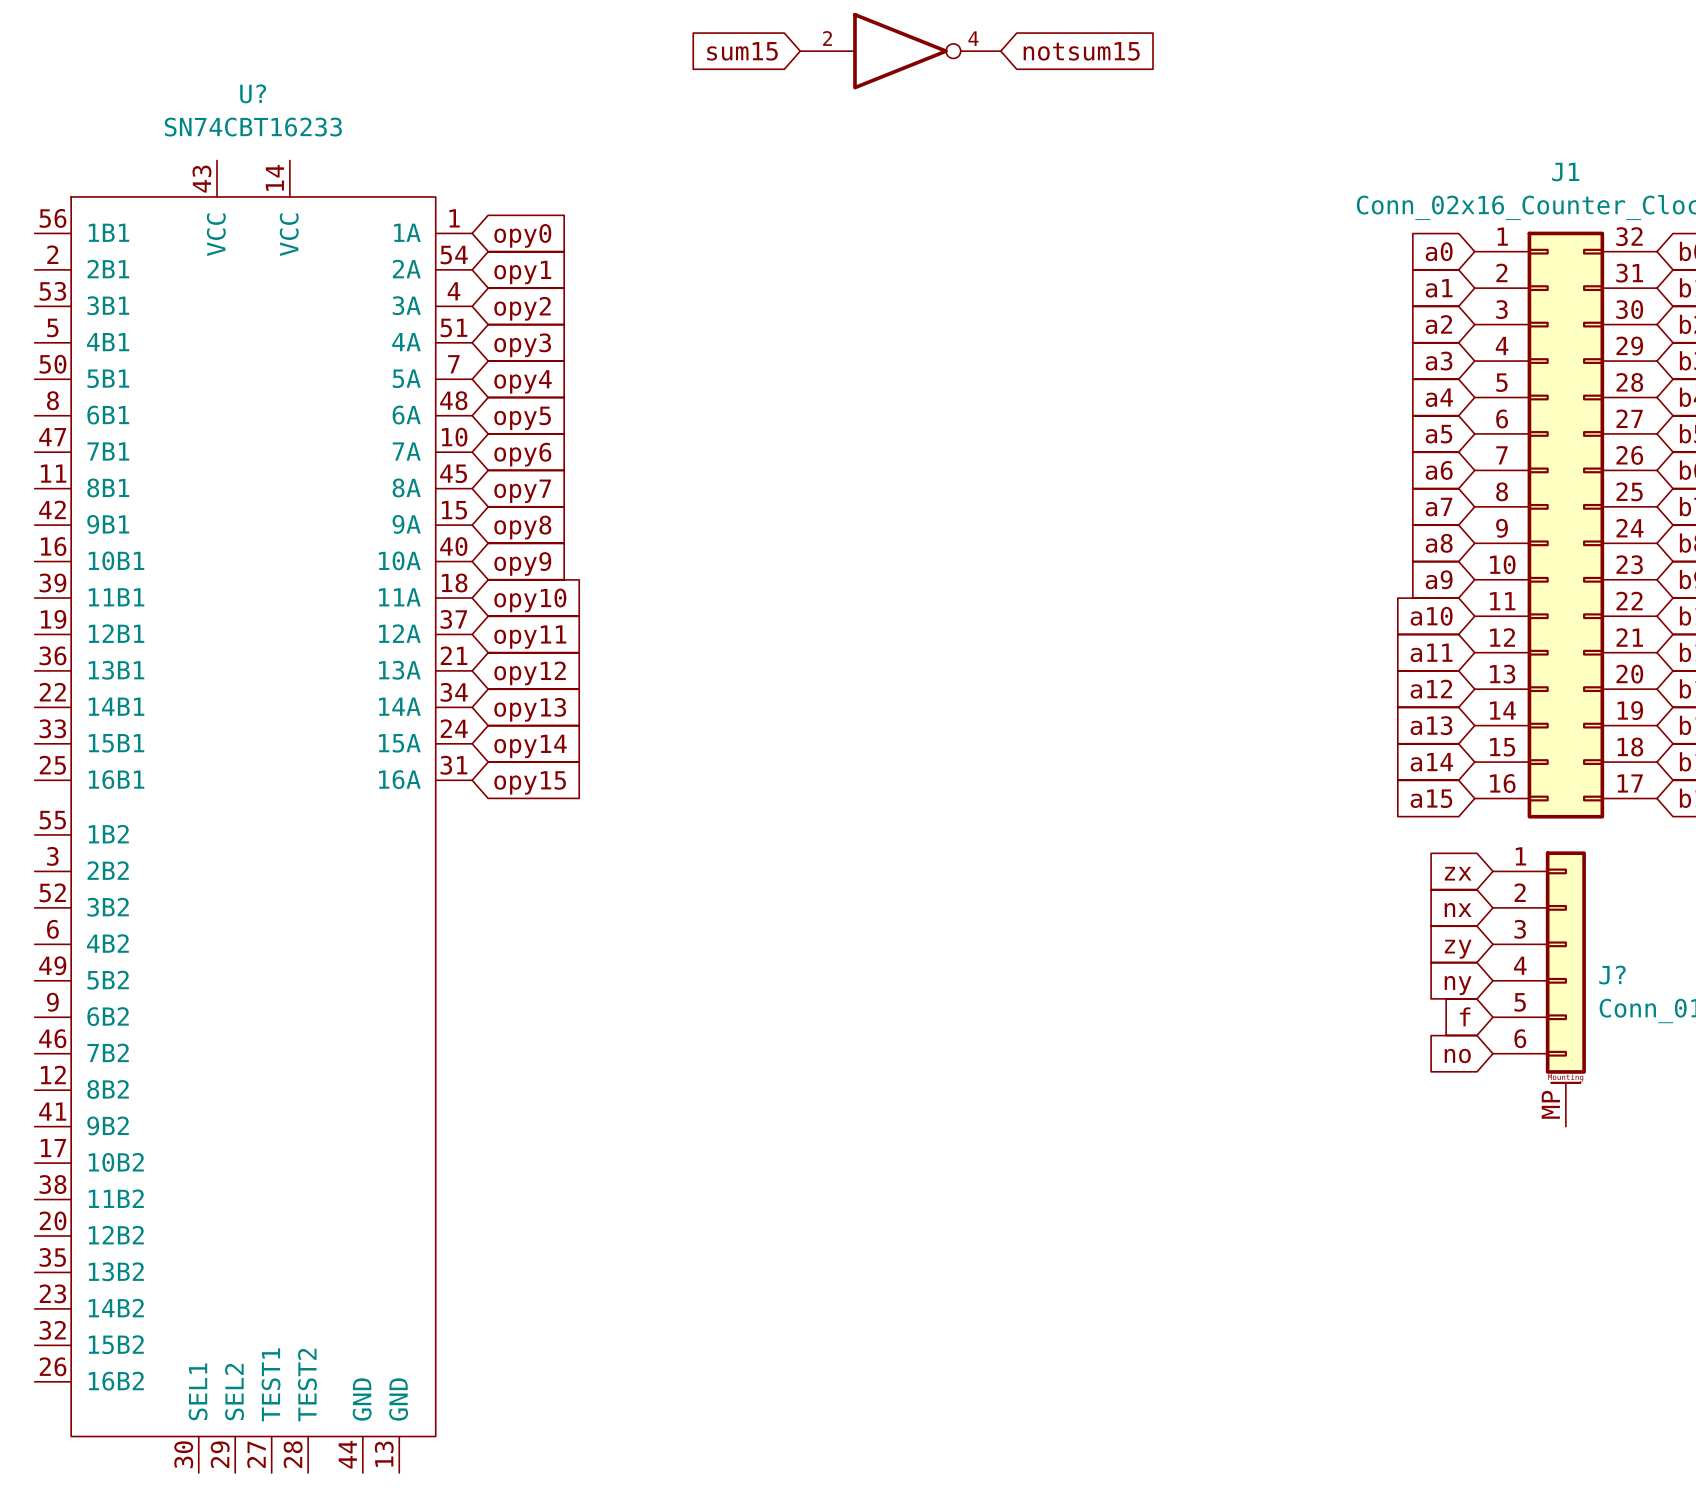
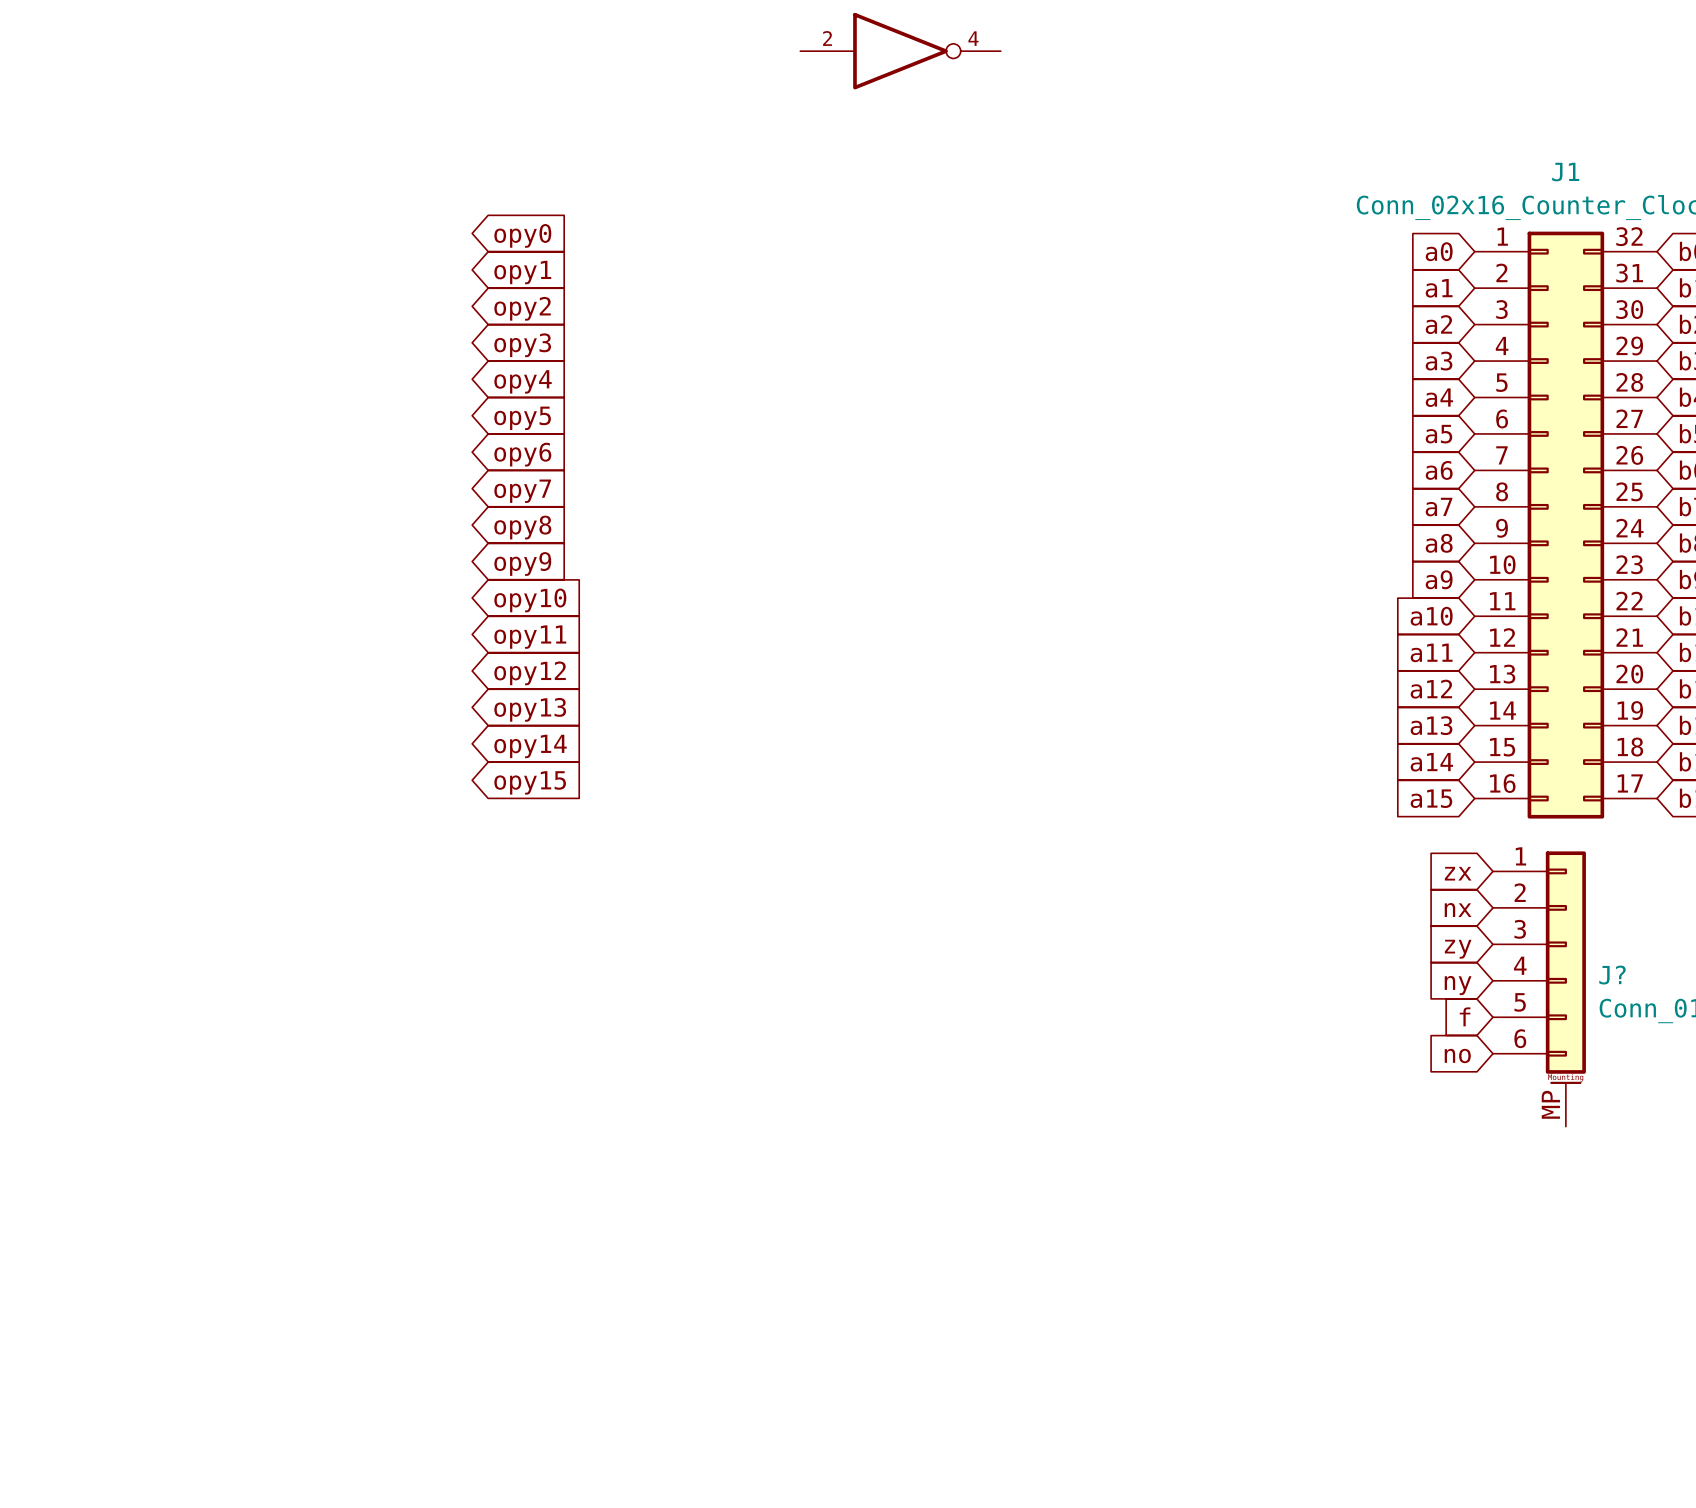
global label: sum15 (742, 51) -> none
global label: notsum15 (1081, 51) -> none
U?: SN74CBT16233 (253, 816) -> none

